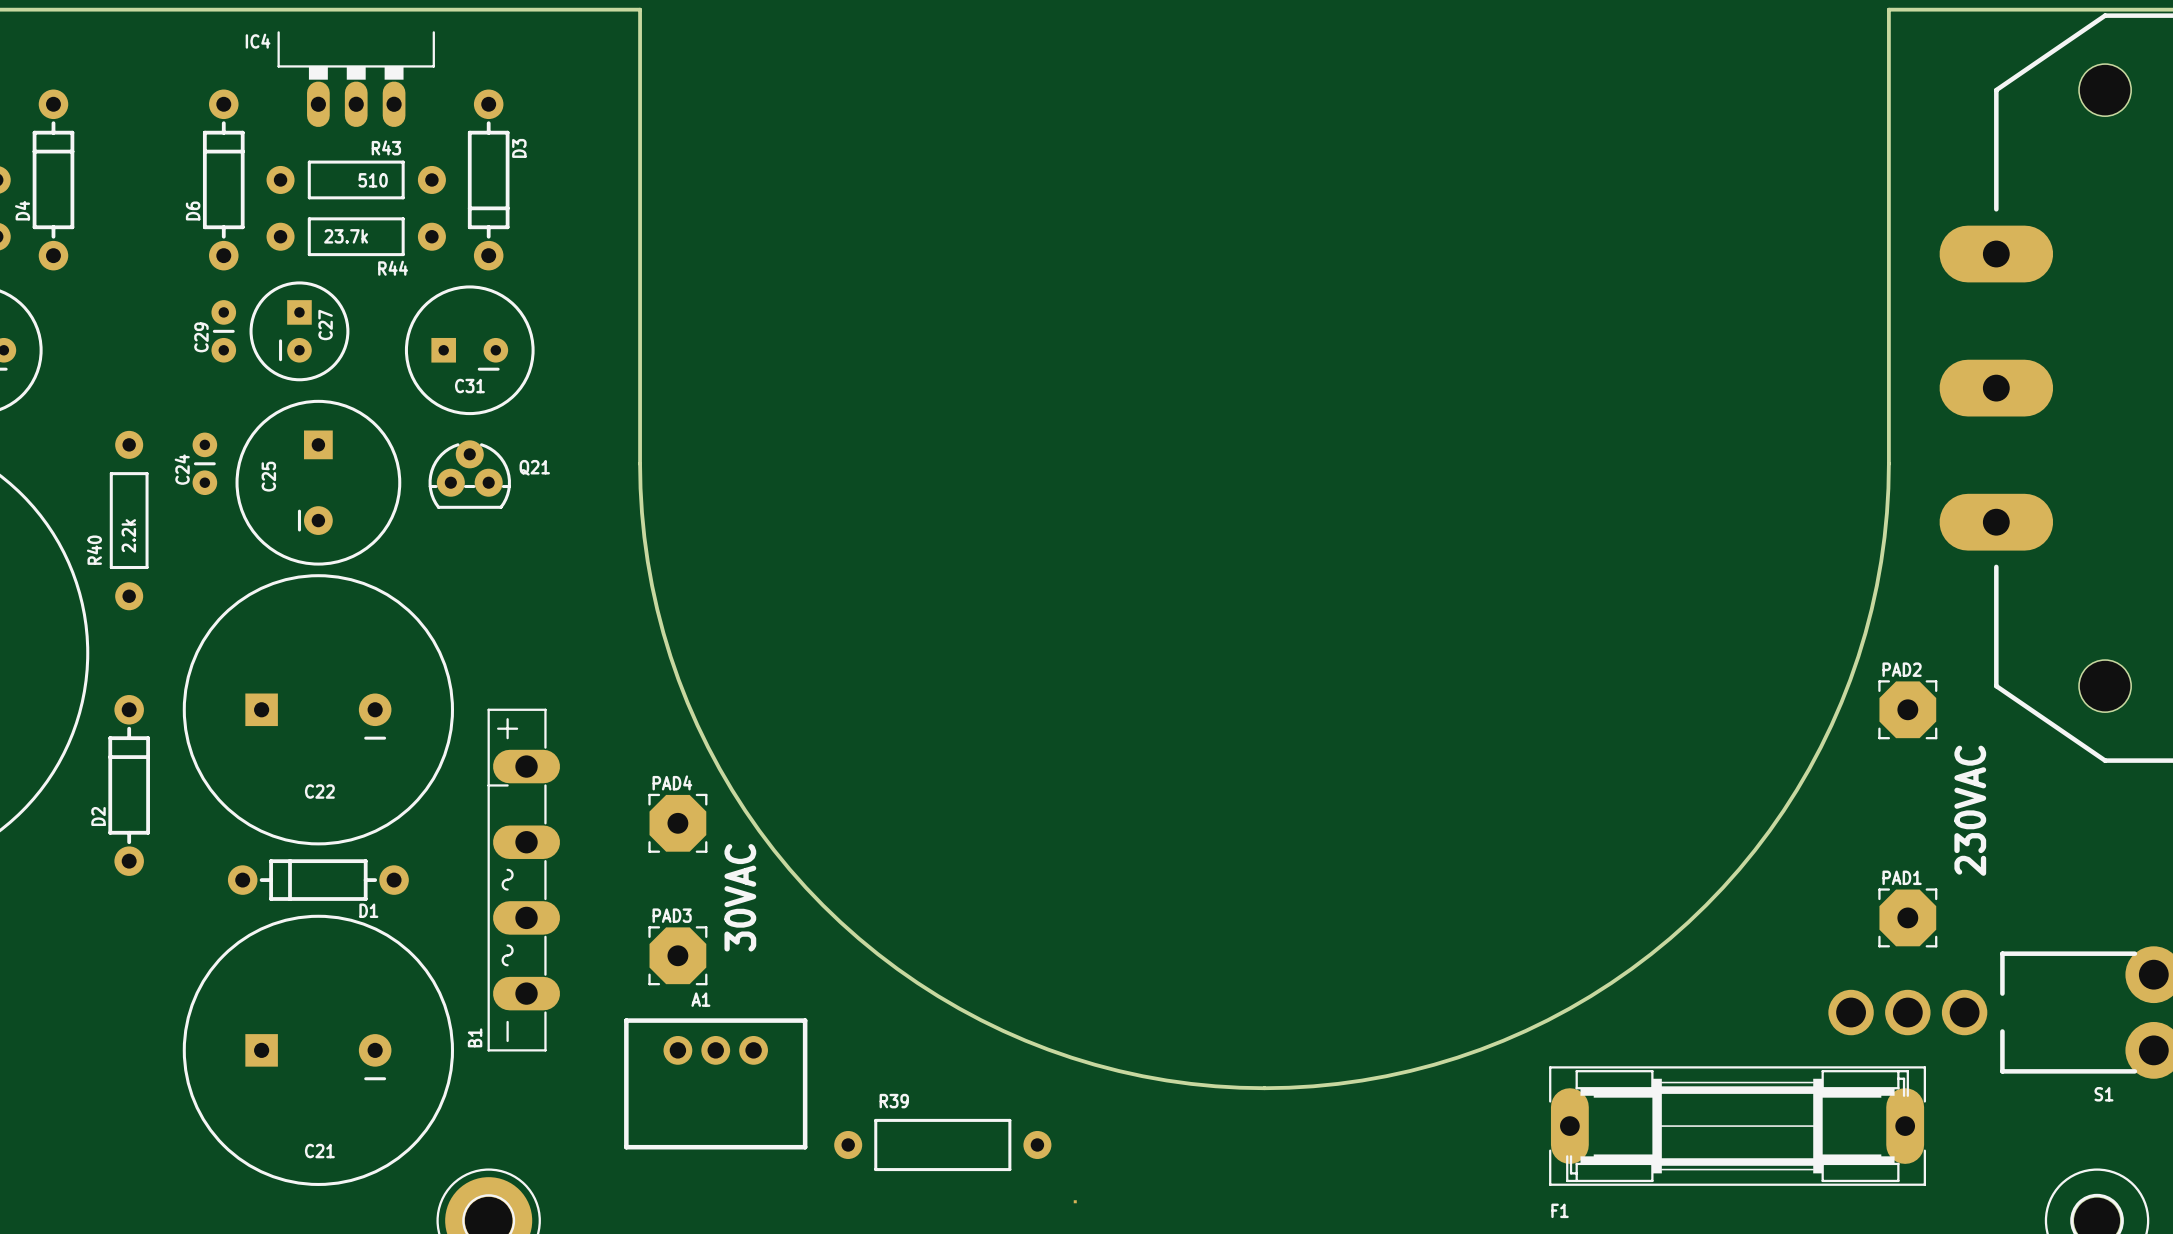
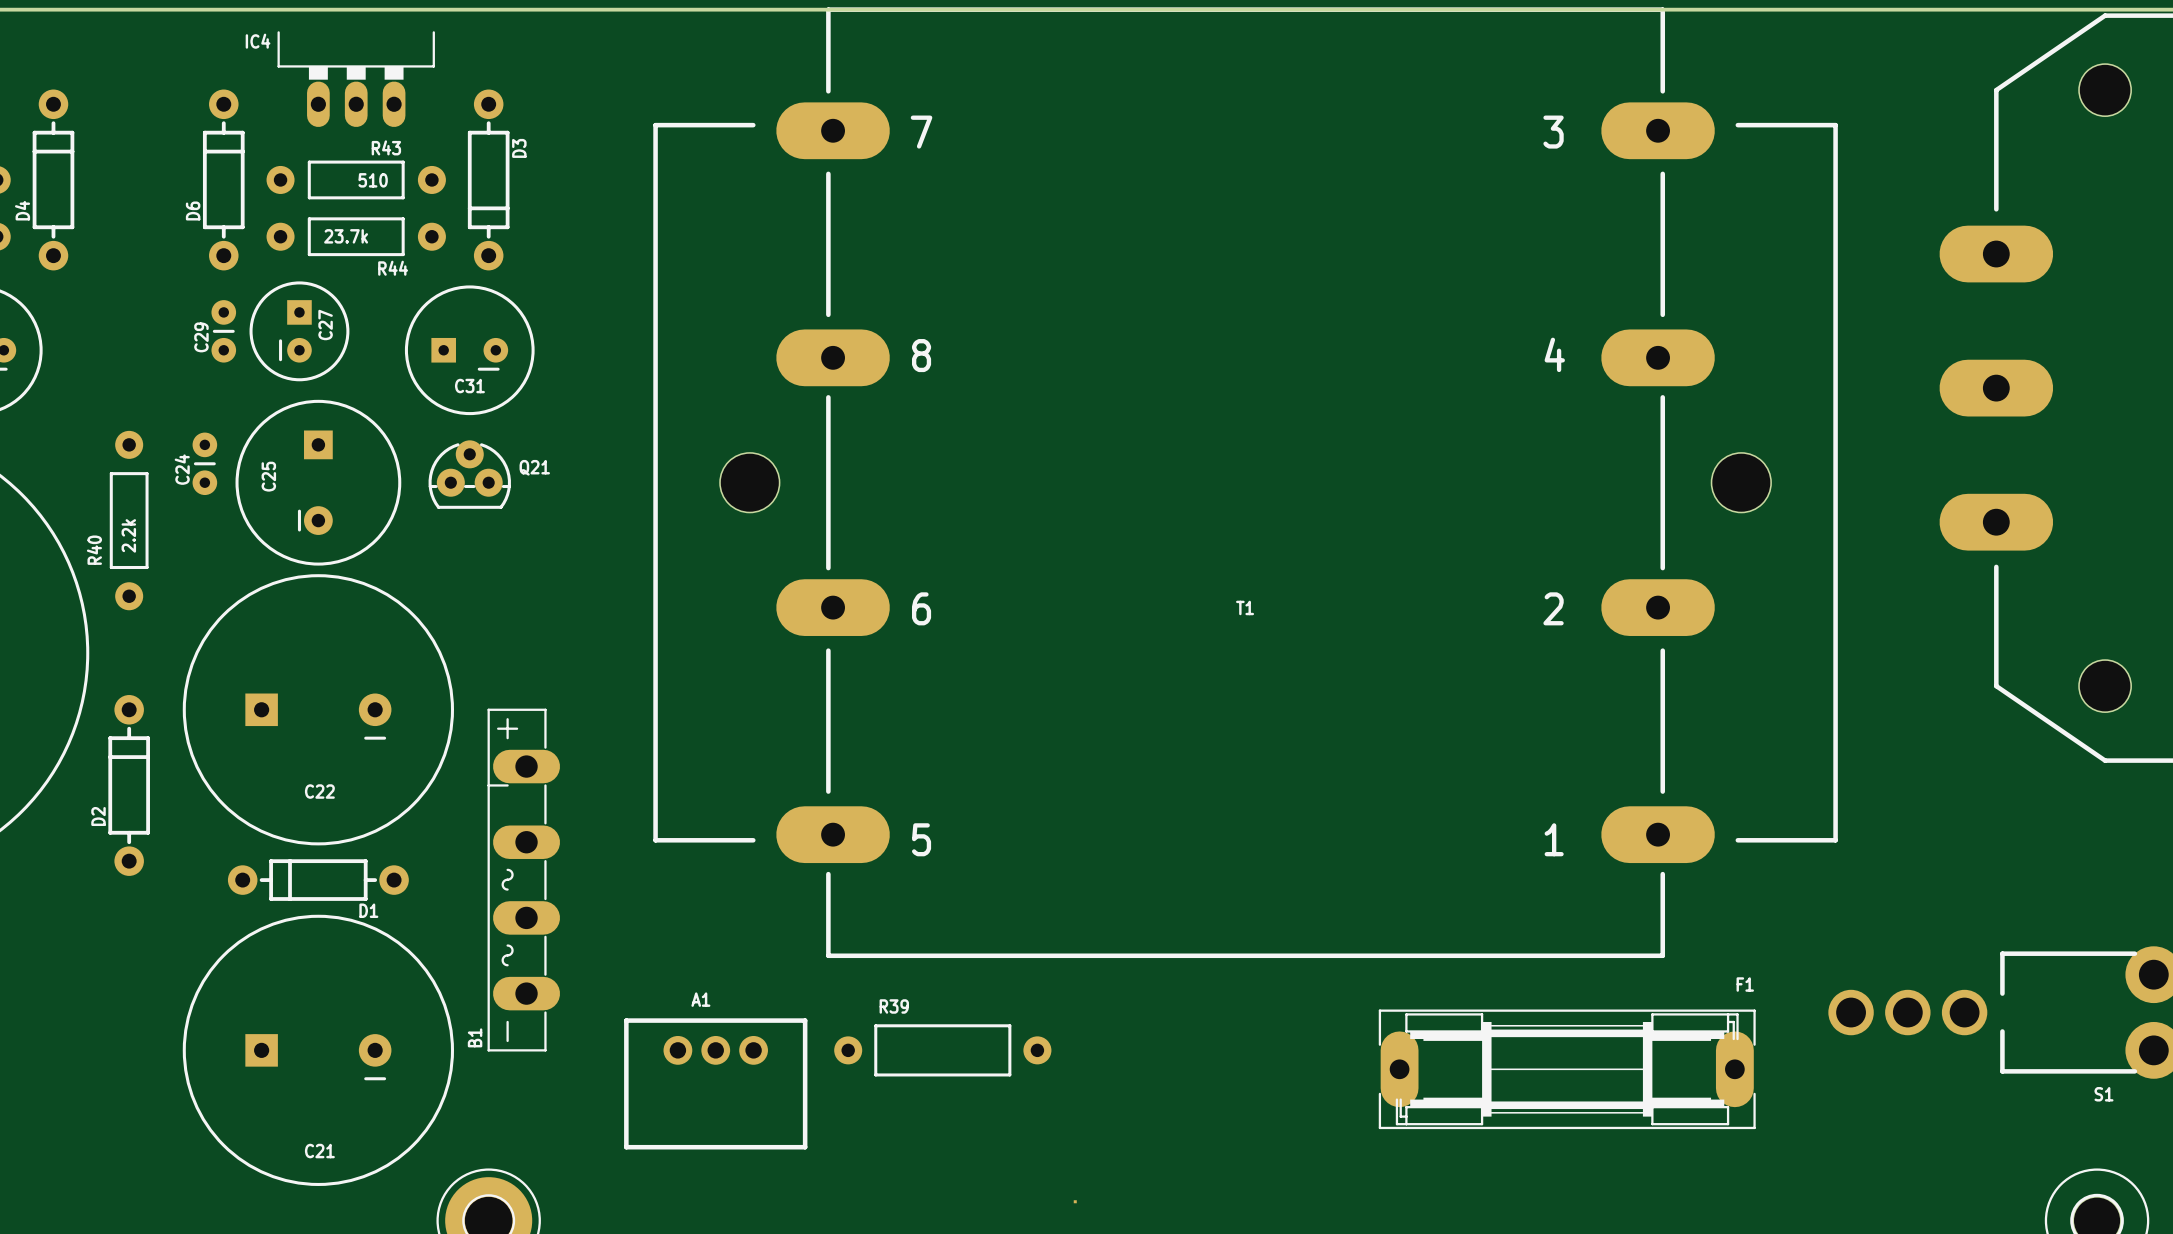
board edge: (640, 9) (640, 463) (644, 537) (652, 585) (670, 656) (687, 702) (719, 768) (759, 830) (789, 869) (822, 905) (858, 938) (897, 968) (959, 1008) (1025, 1040) (1094, 1064) (1142, 1076) (1191, 1083) (1264, 1088) (1337, 1083) (1386, 1076) (1433, 1064) (1503, 1040) (1569, 1008) (1631, 968) (1670, 938) (1706, 905) (1739, 869) (1769, 830) (1809, 768) (1841, 702) (1858, 656) (1876, 585) (1884, 537) (1888, 463) (1888, 9) -> (640, 9) (1888, 9)
T1: none -> (1245, 482)
PAD2: (1907, 709) -> none
text: 230VAC (1970, 810) -> none
PAD4: (677, 823) -> none
text: 30VAC (740, 897) -> none
PAD1: (1907, 917) -> none
PAD3: (677, 955) -> none
F1 position: (1737, 1126) -> (1567, 1069)
R39 position: (942, 1144) -> (942, 1050)
F1 name position: F1 (1560, 1210) -> F1 (1745, 984)

